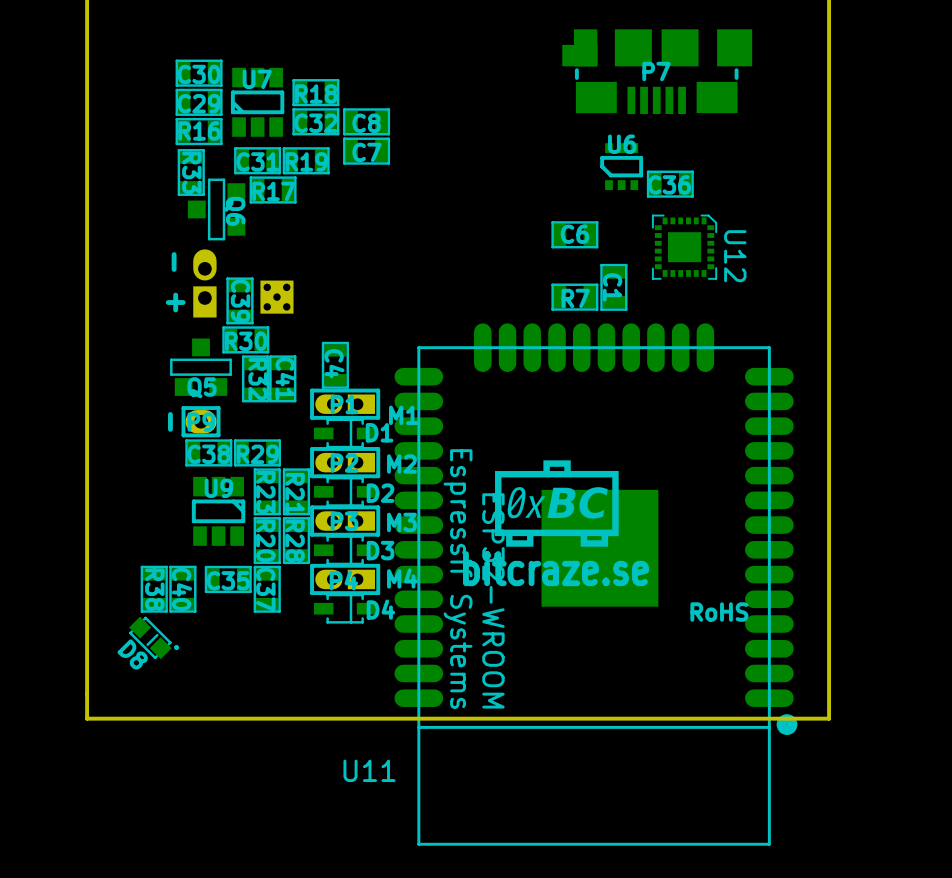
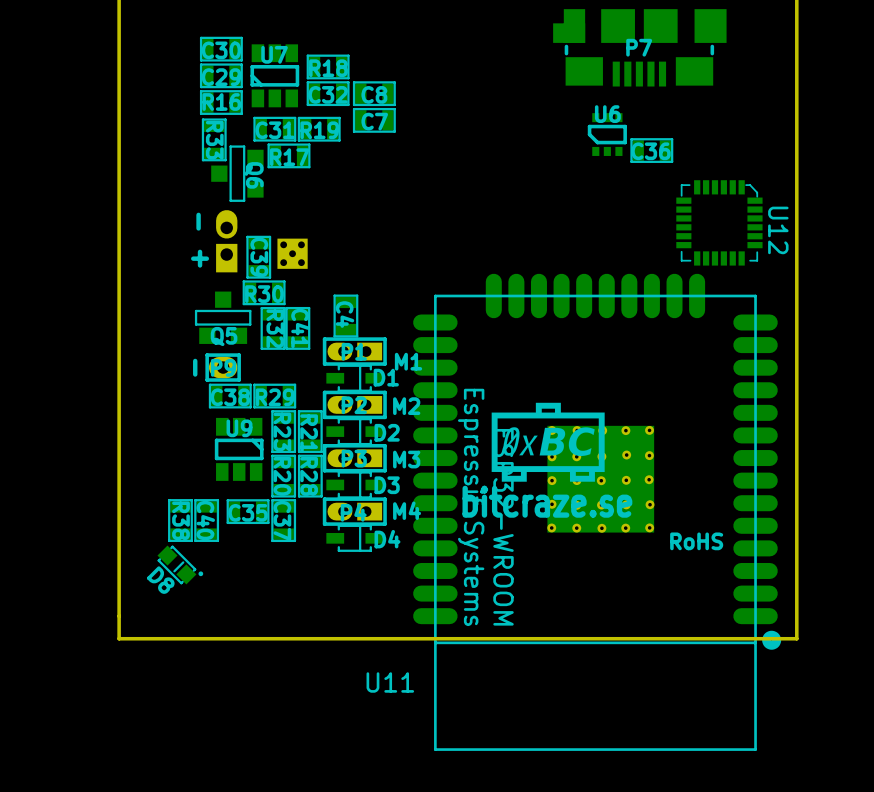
U12 footprint: [651, 214, 718, 280] -> [676, 180, 763, 266]
C6: (574, 234) -> none
C1: (613, 287) -> none
R7: (574, 297) -> none
U11 footprint: [394, 323, 798, 846] -> [413, 273, 782, 751]

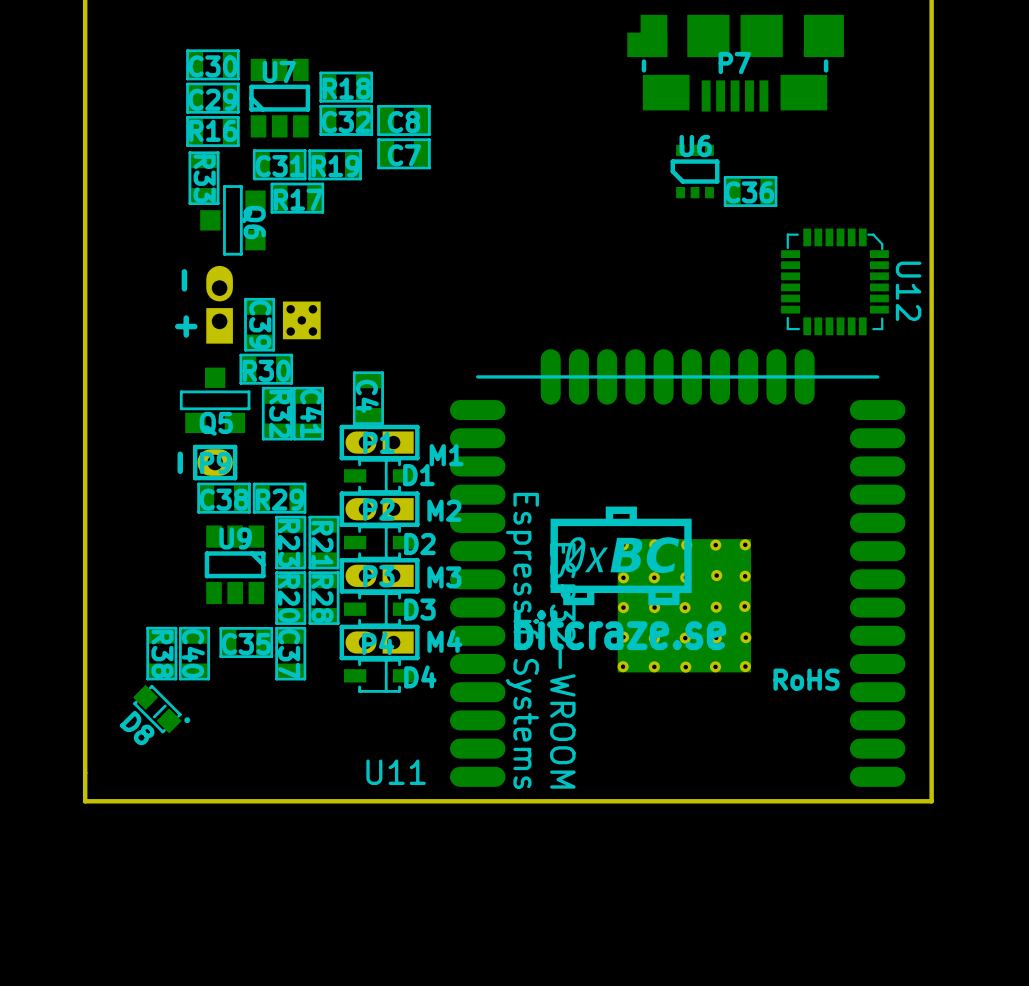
U11 footprint: [413, 273, 782, 751] -> [449, 349, 906, 787]

